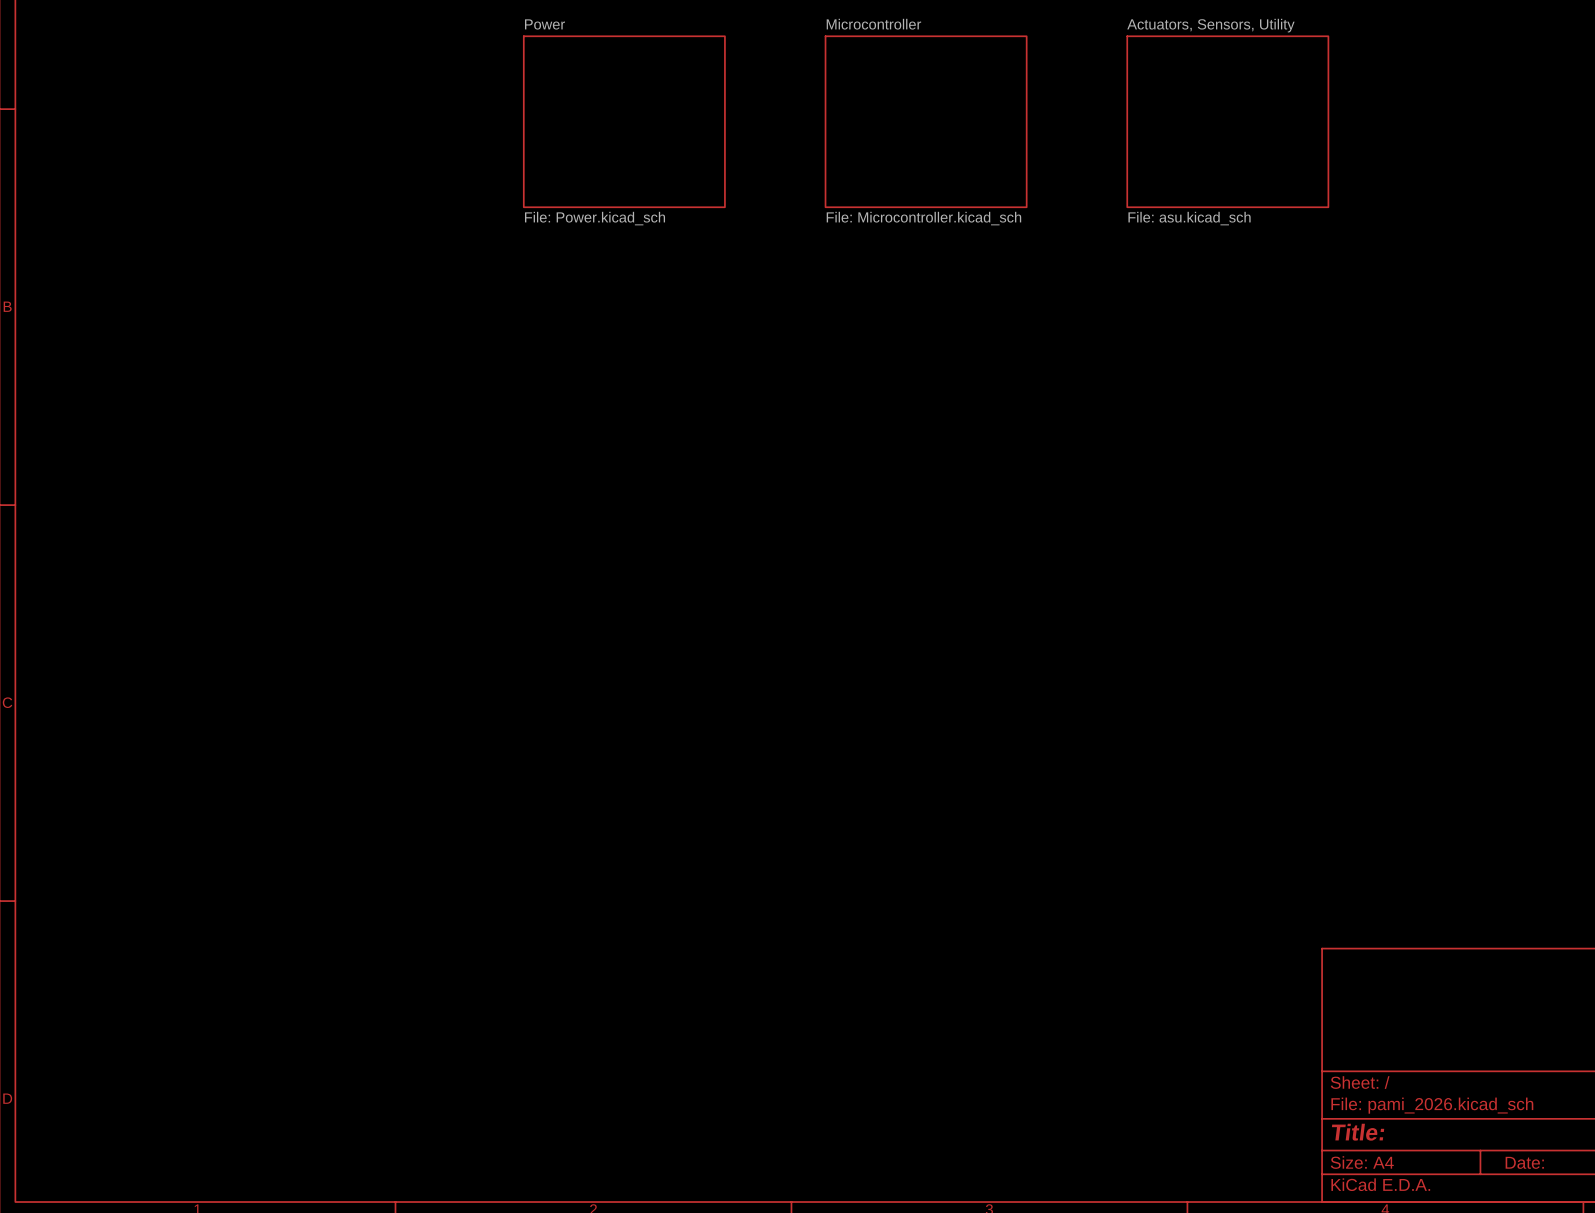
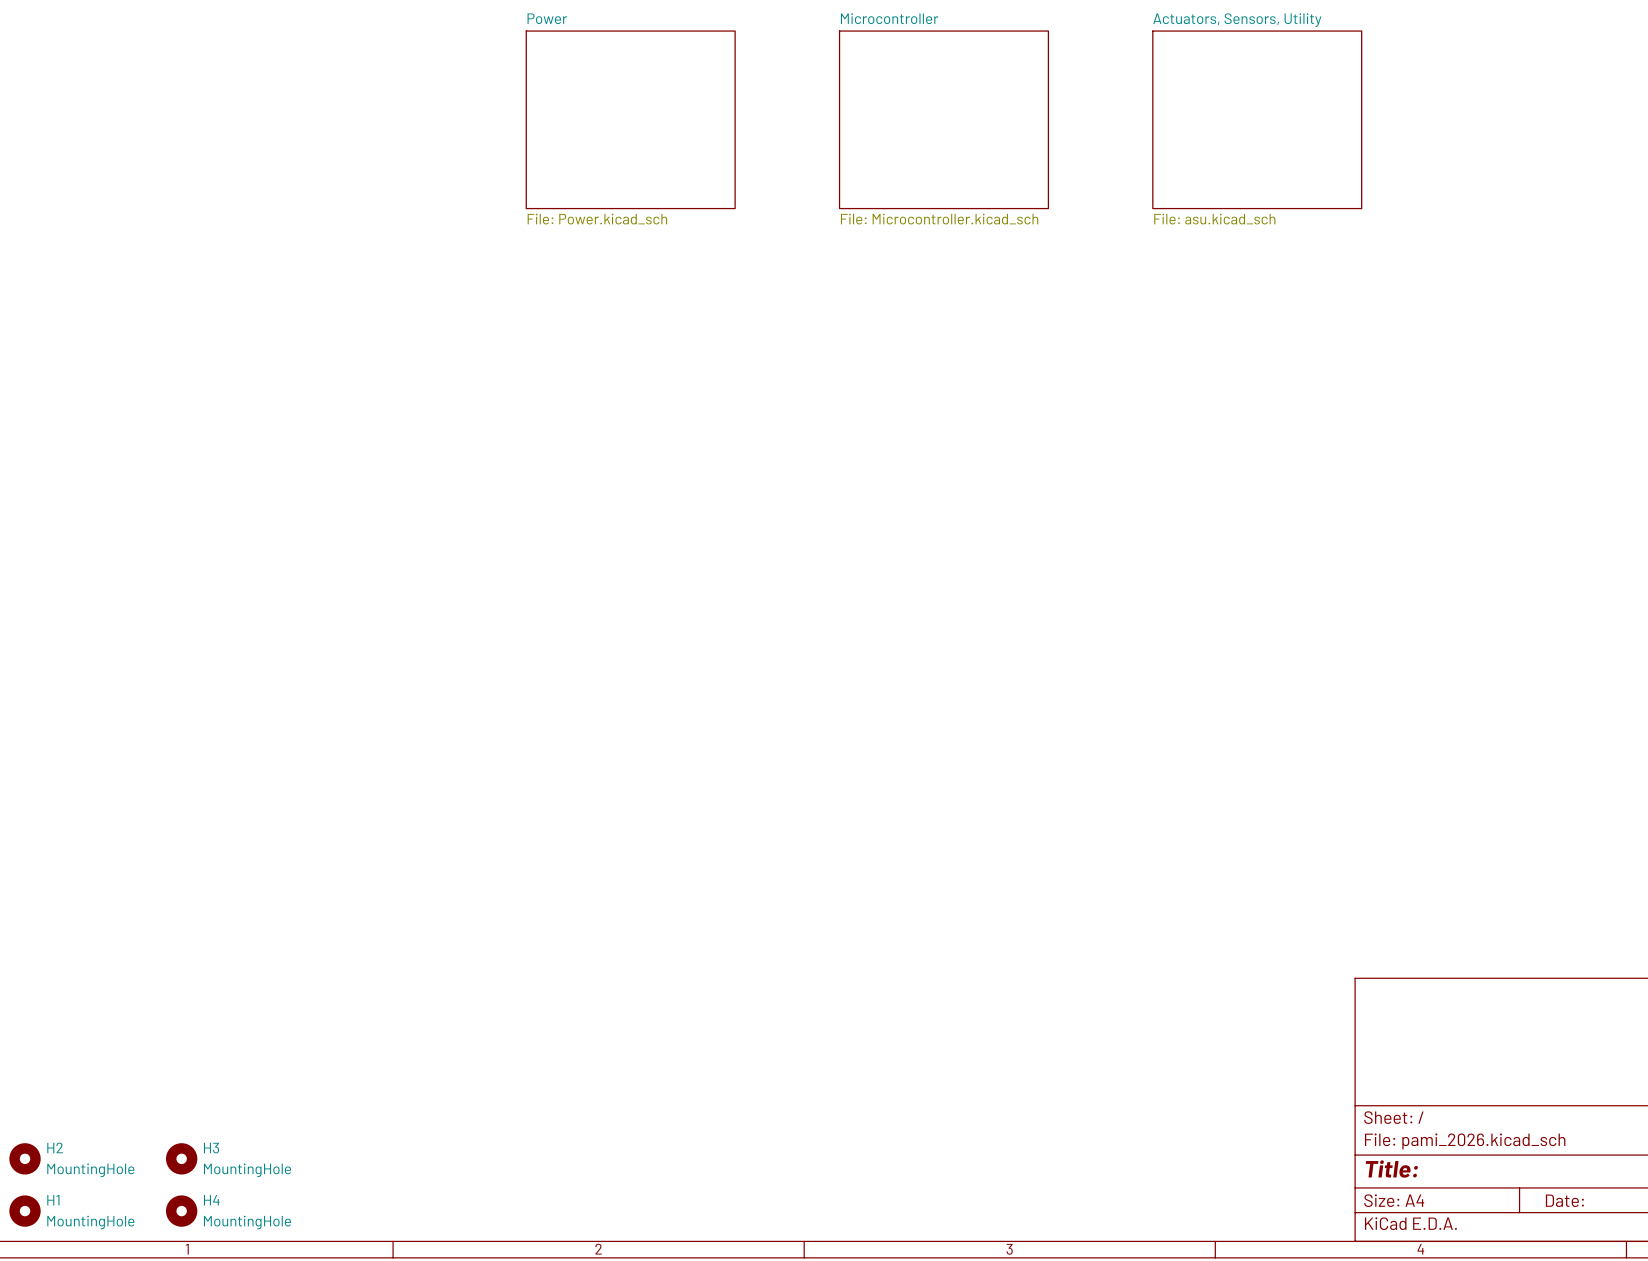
H2: none -> MountingHole (25, 1158)
H3: none -> MountingHole (181, 1158)
H1: none -> MountingHole (25, 1211)
H4: none -> MountingHole (181, 1211)

